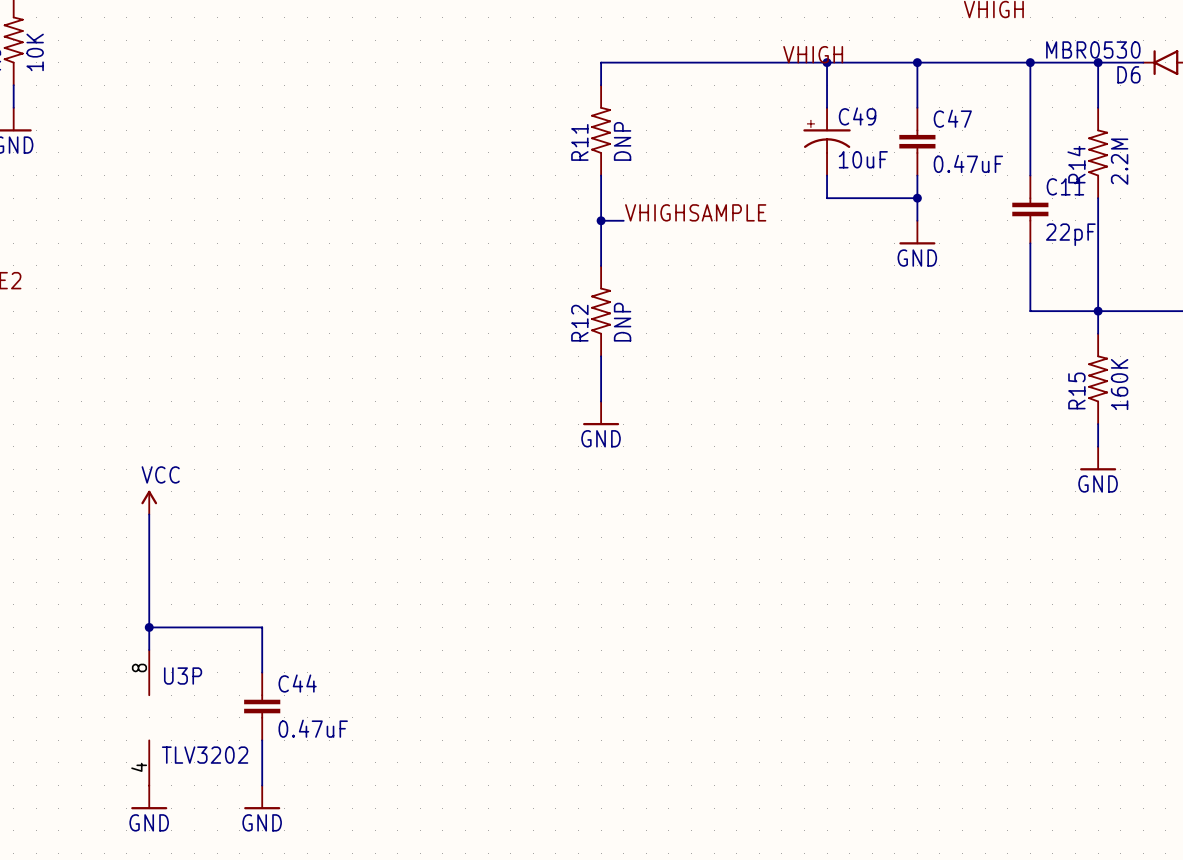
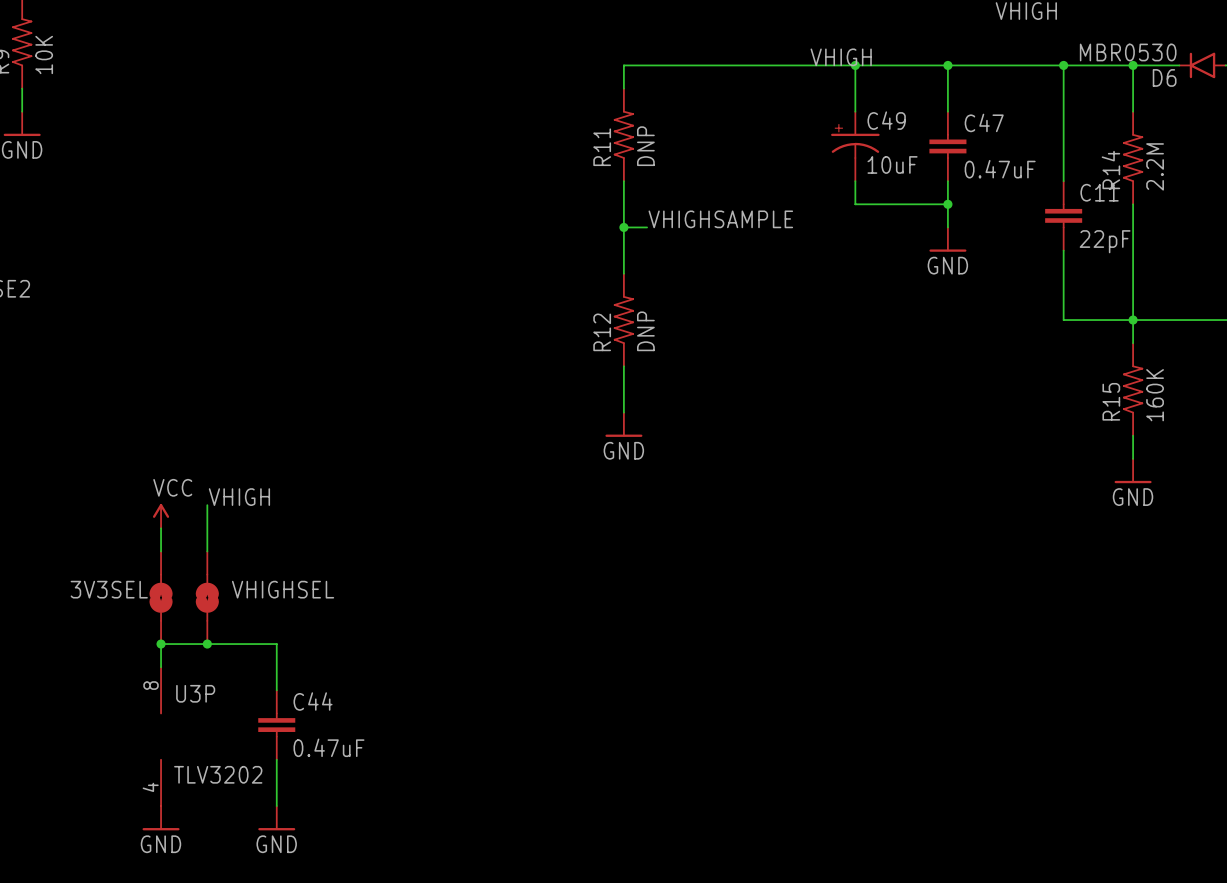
label: none -> VHIGH (239, 497)
wire: none -> (207, 505) (207, 551)
3V3SEL: none -> (161, 597)
VHIGHSEL: none -> (207, 597)
junction: none -> (207, 644)

